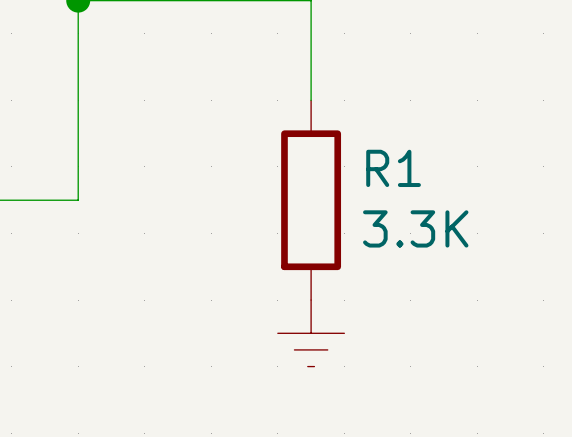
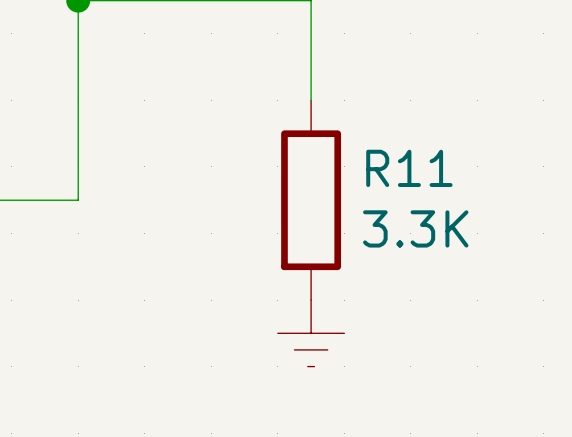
R1 name: R1 (393, 168) -> R11 (409, 168)

